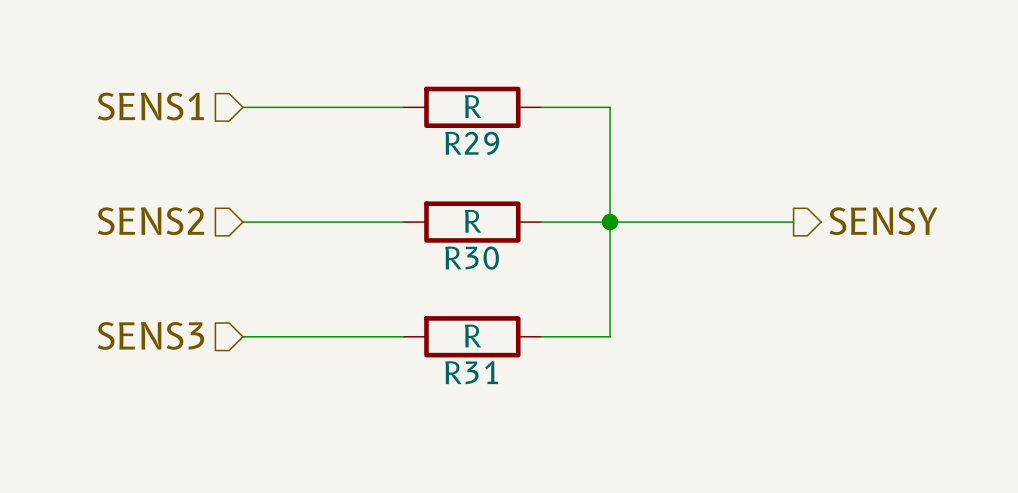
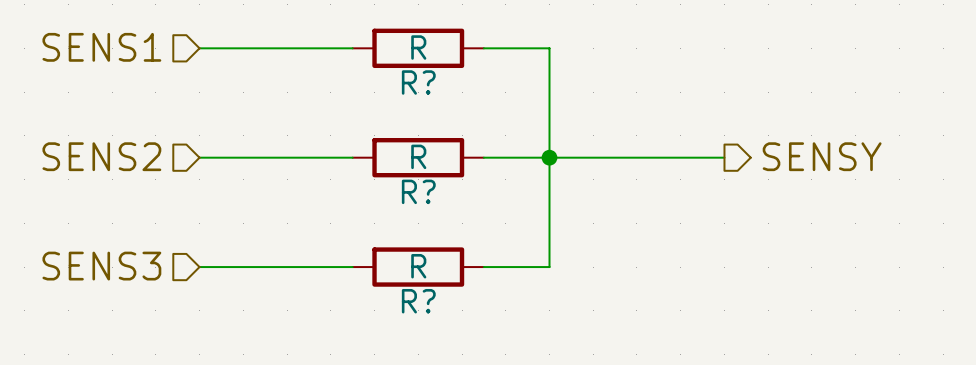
R29 name: R29 (472, 143) -> R? (418, 82)
R30 name: R30 (472, 258) -> R? (418, 191)
R31 name: R31 (471, 372) -> R? (418, 301)

